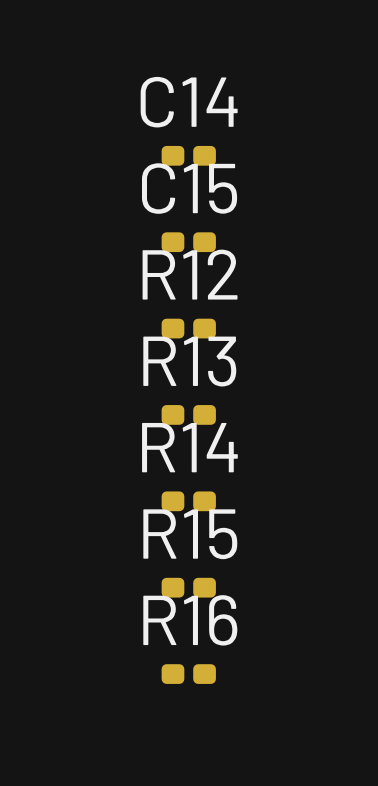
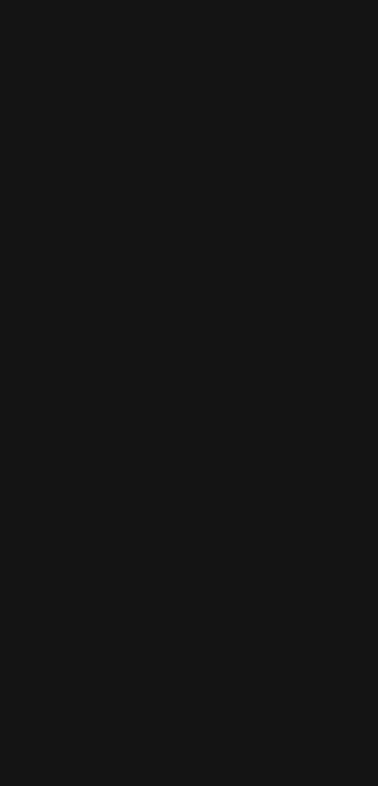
C14: (188, 155) -> none
C15: (188, 242) -> none
R12: (188, 328) -> none
R13: (188, 414) -> none
R14: (188, 501) -> none
R15: (188, 587) -> none
R16: (188, 674) -> none

